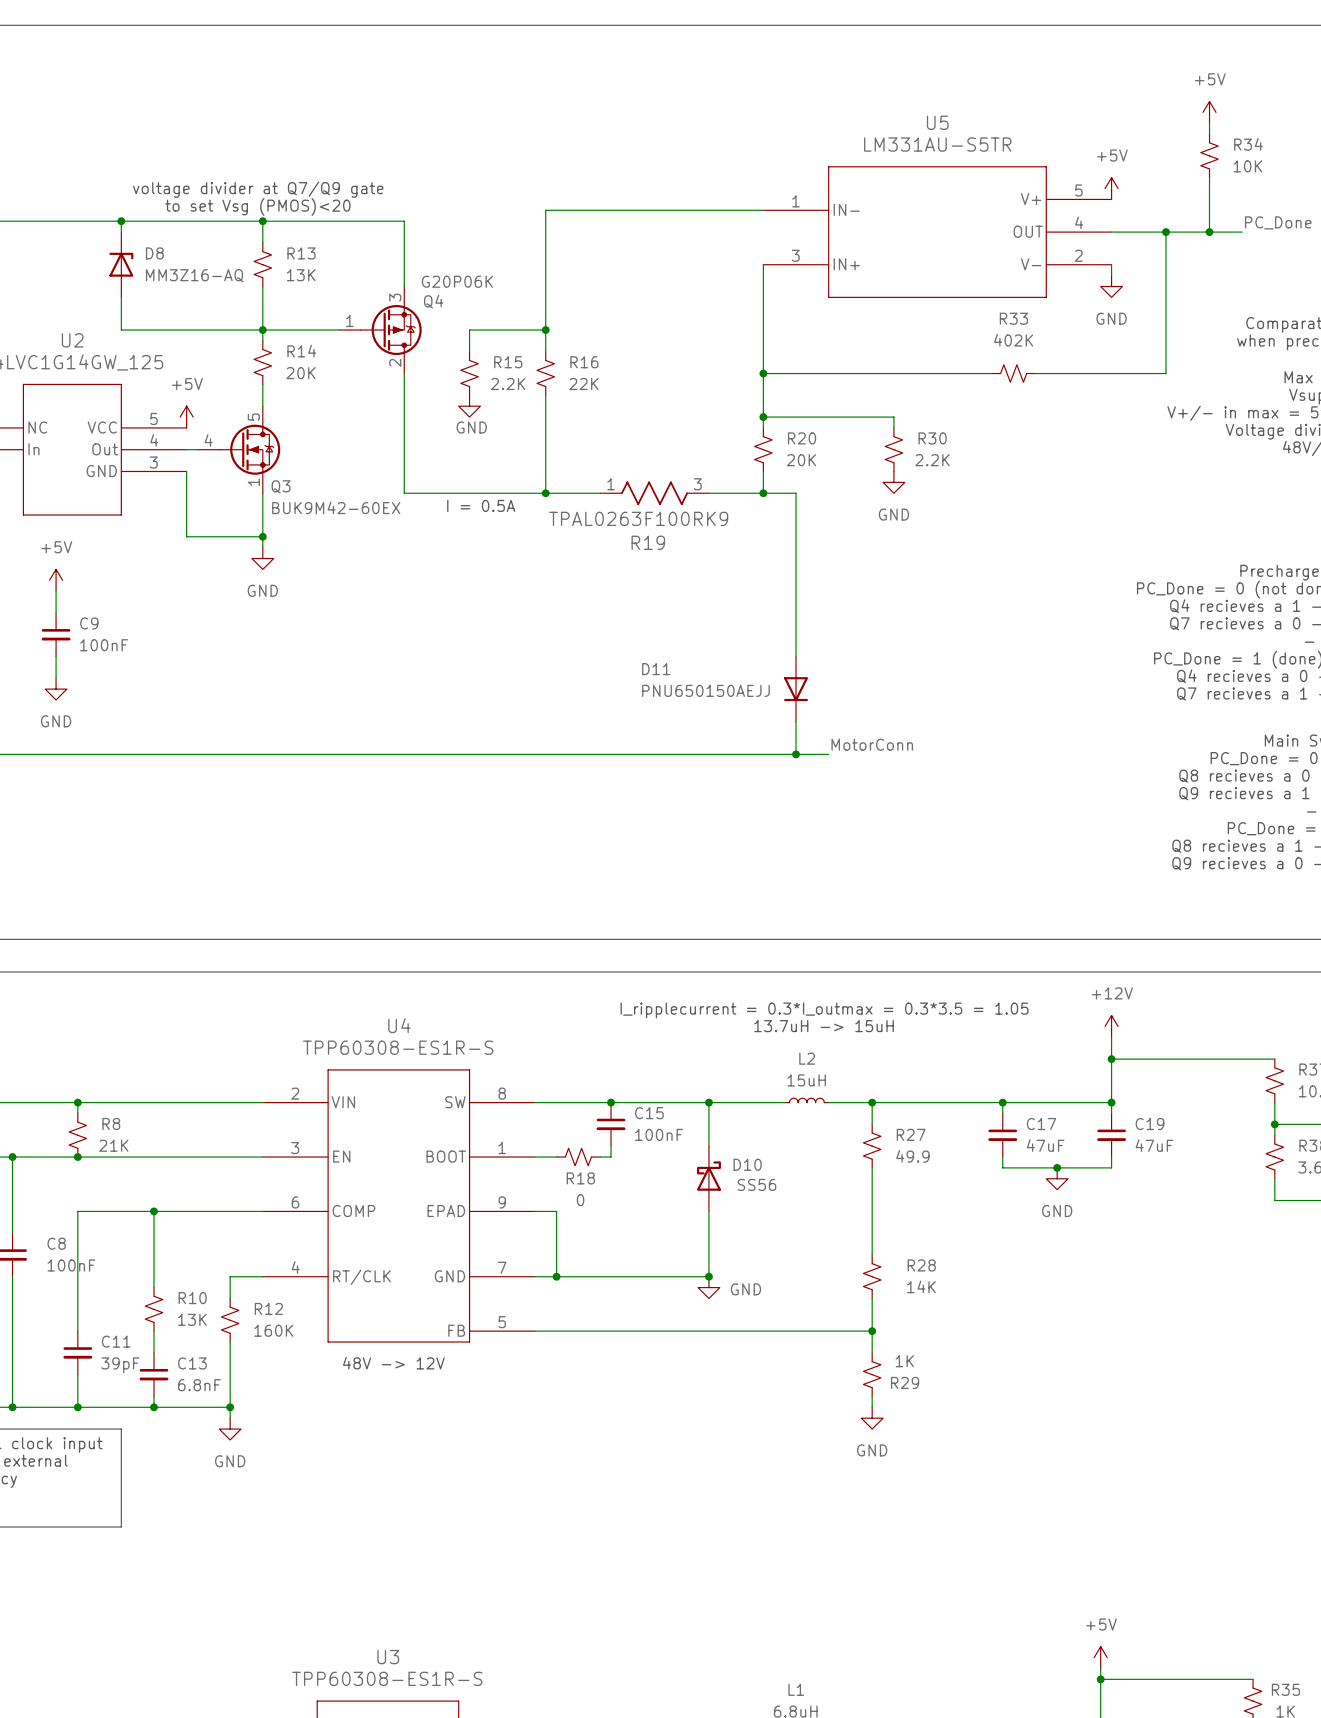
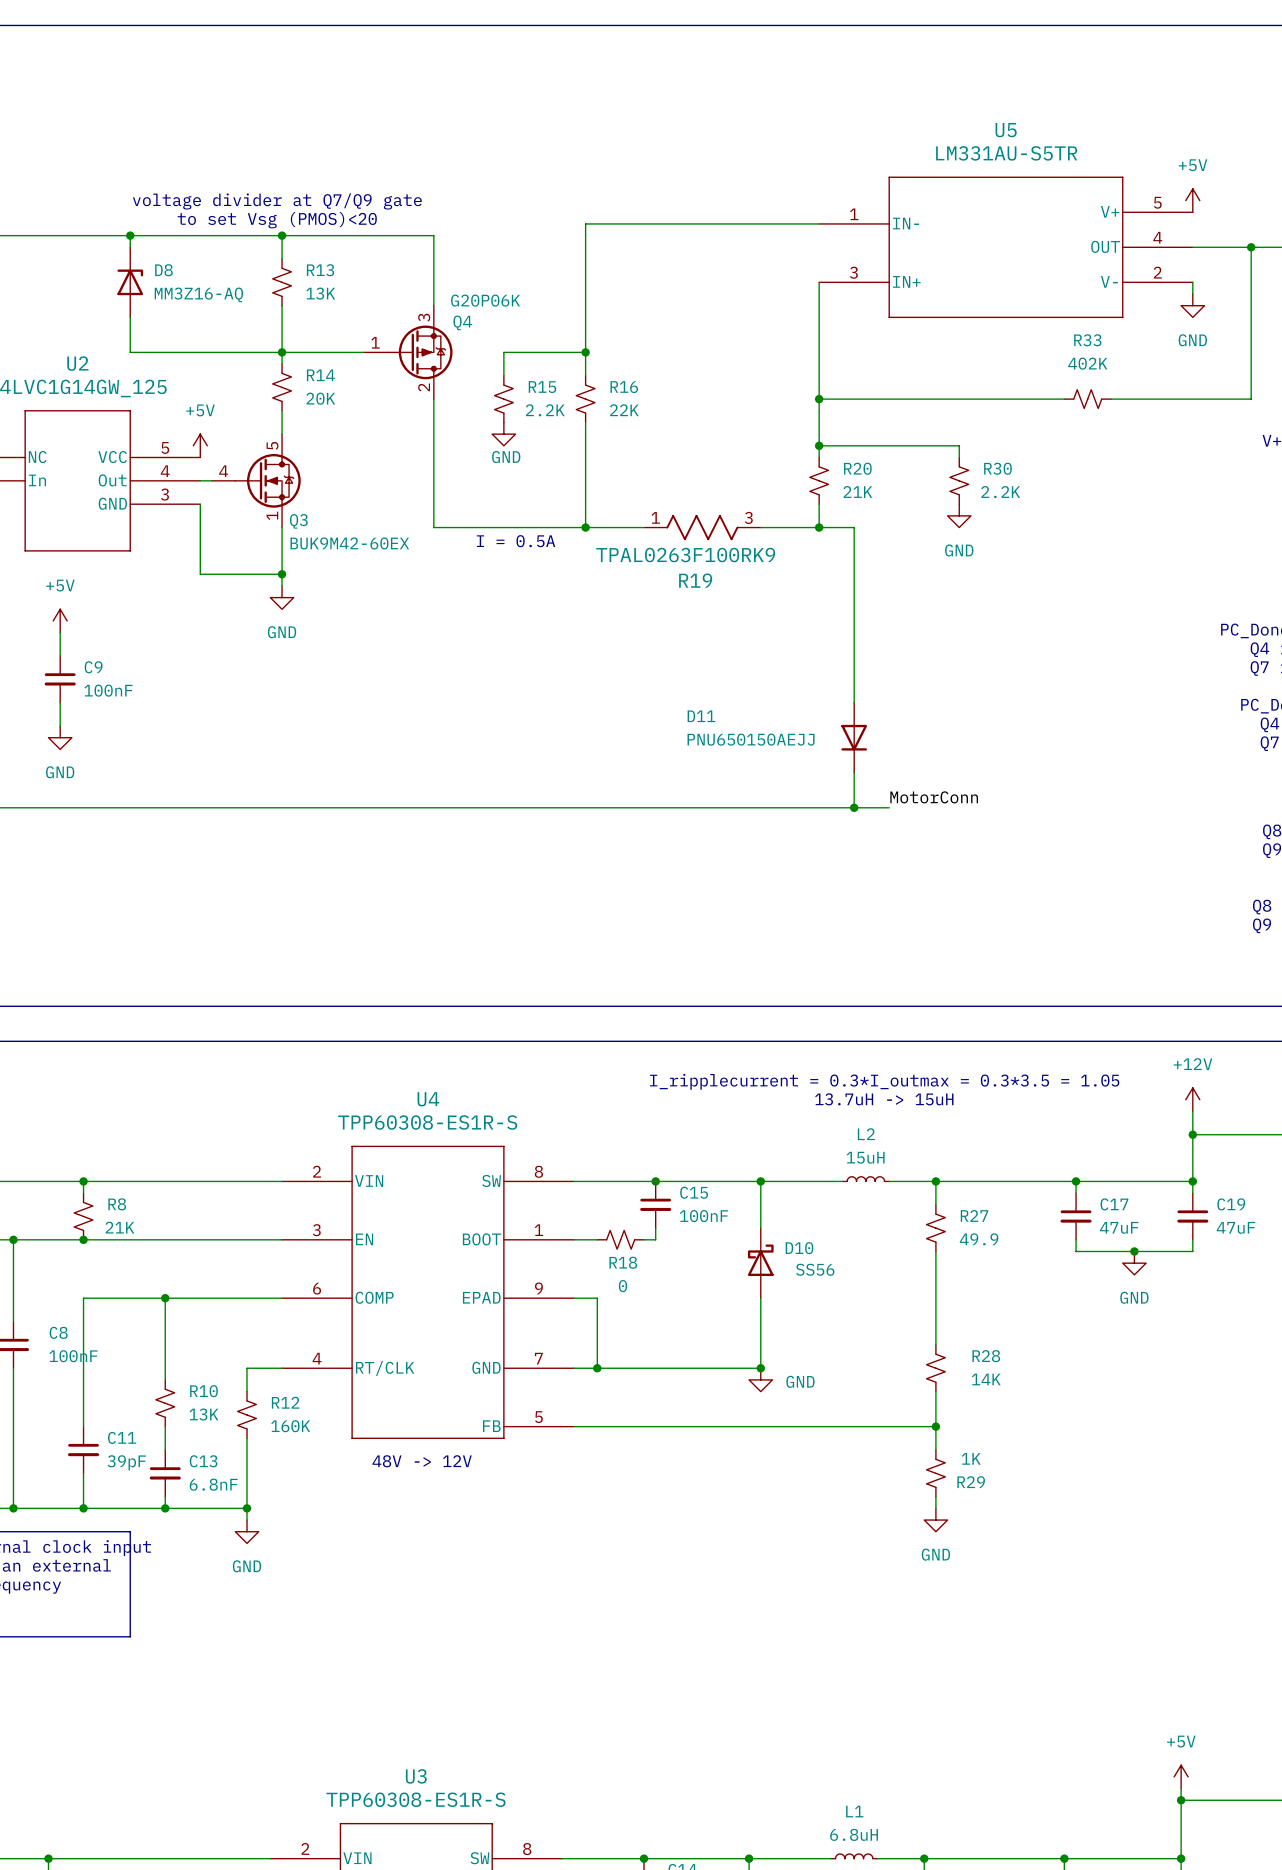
R20 value: 20K (801, 460) -> 21K (857, 491)

